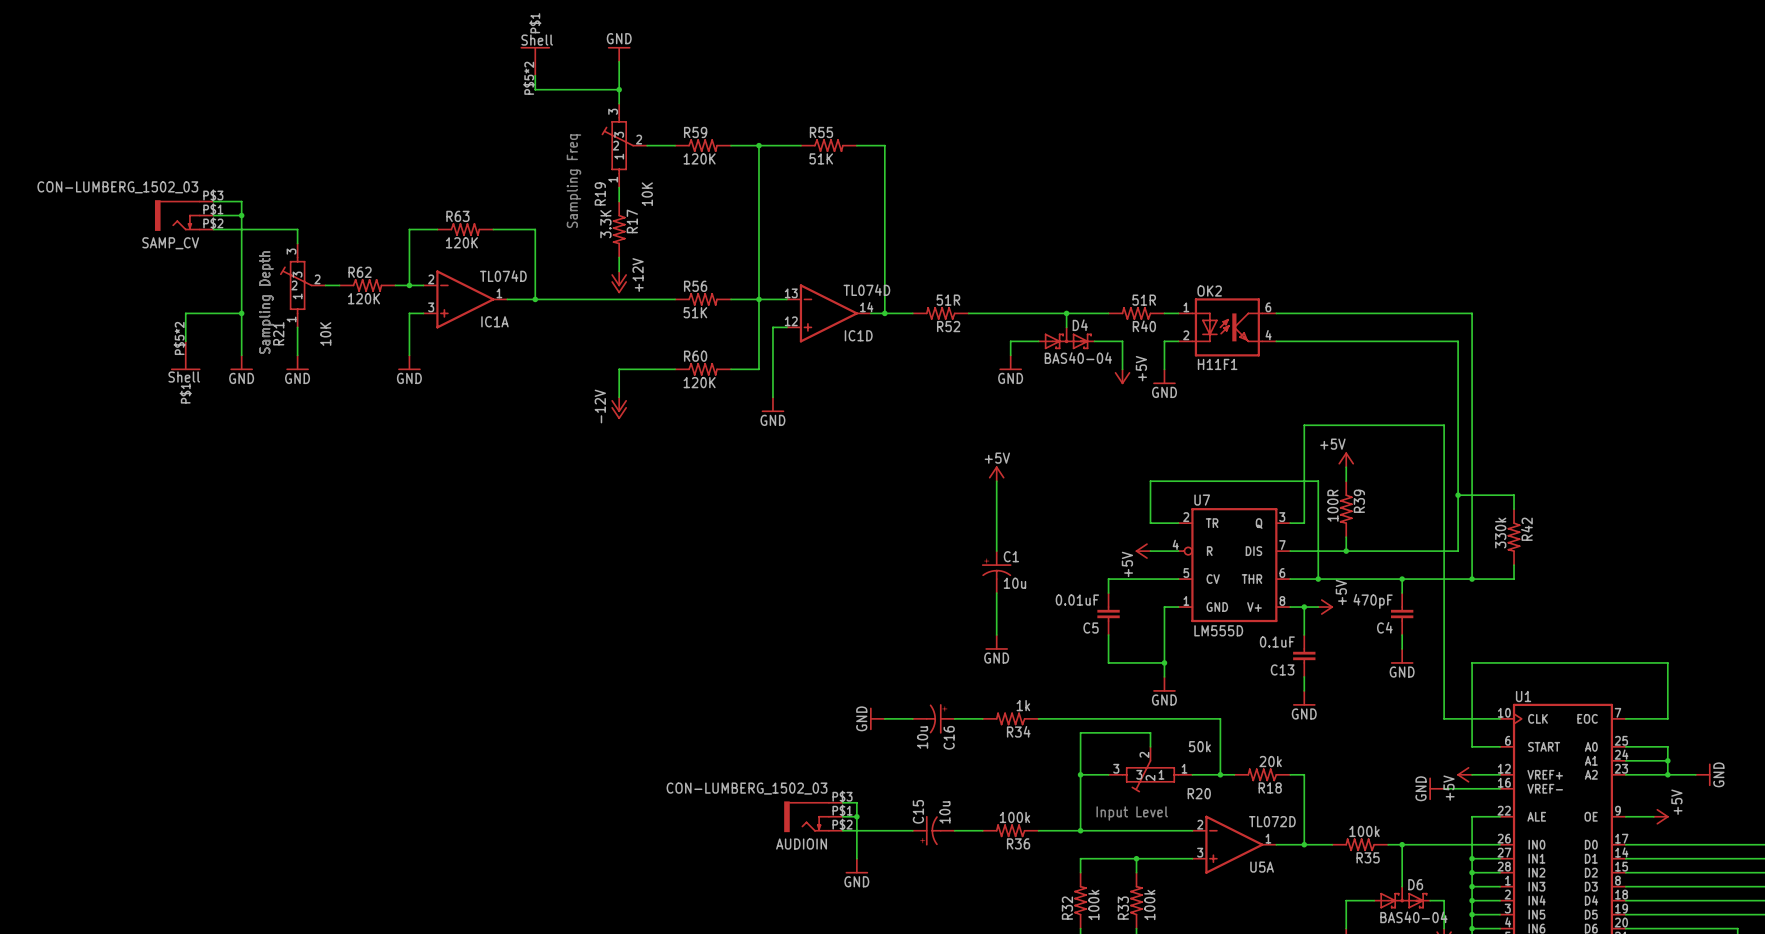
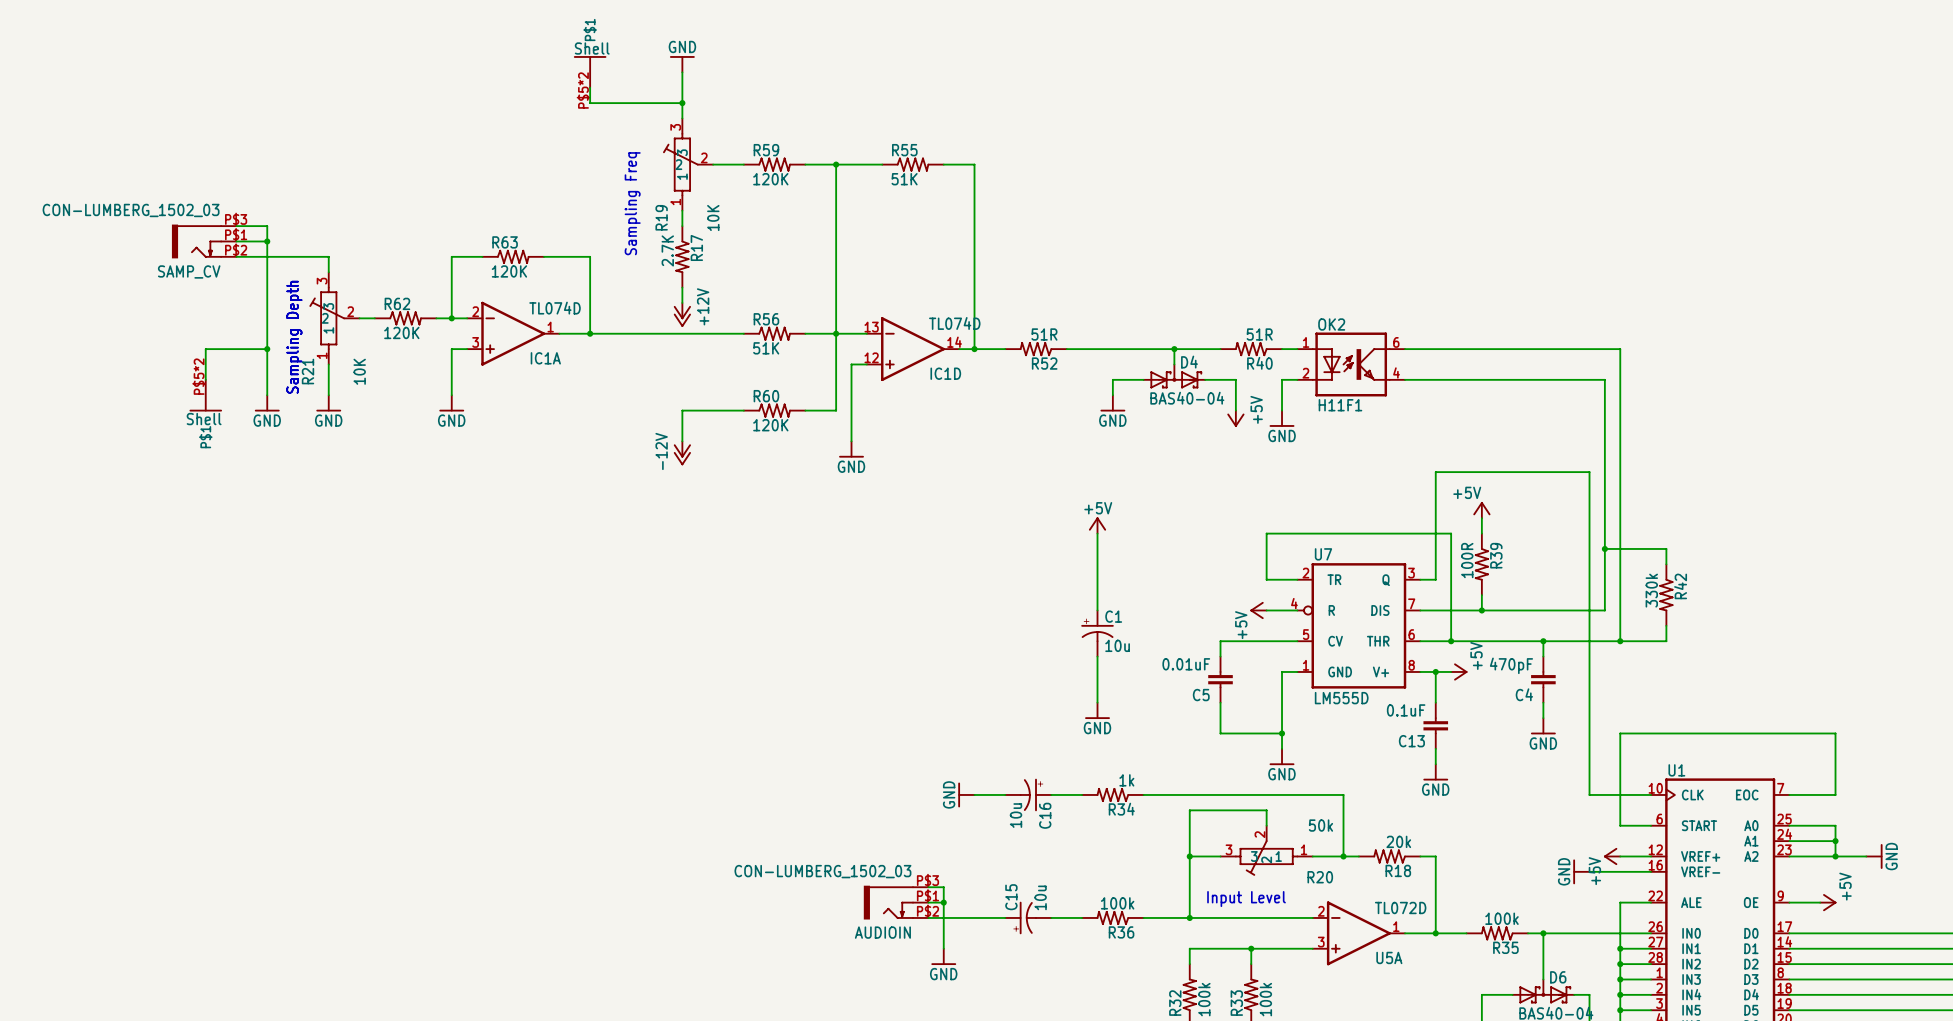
R17 value: 3.3K (605, 224) -> 2.7K (667, 250)

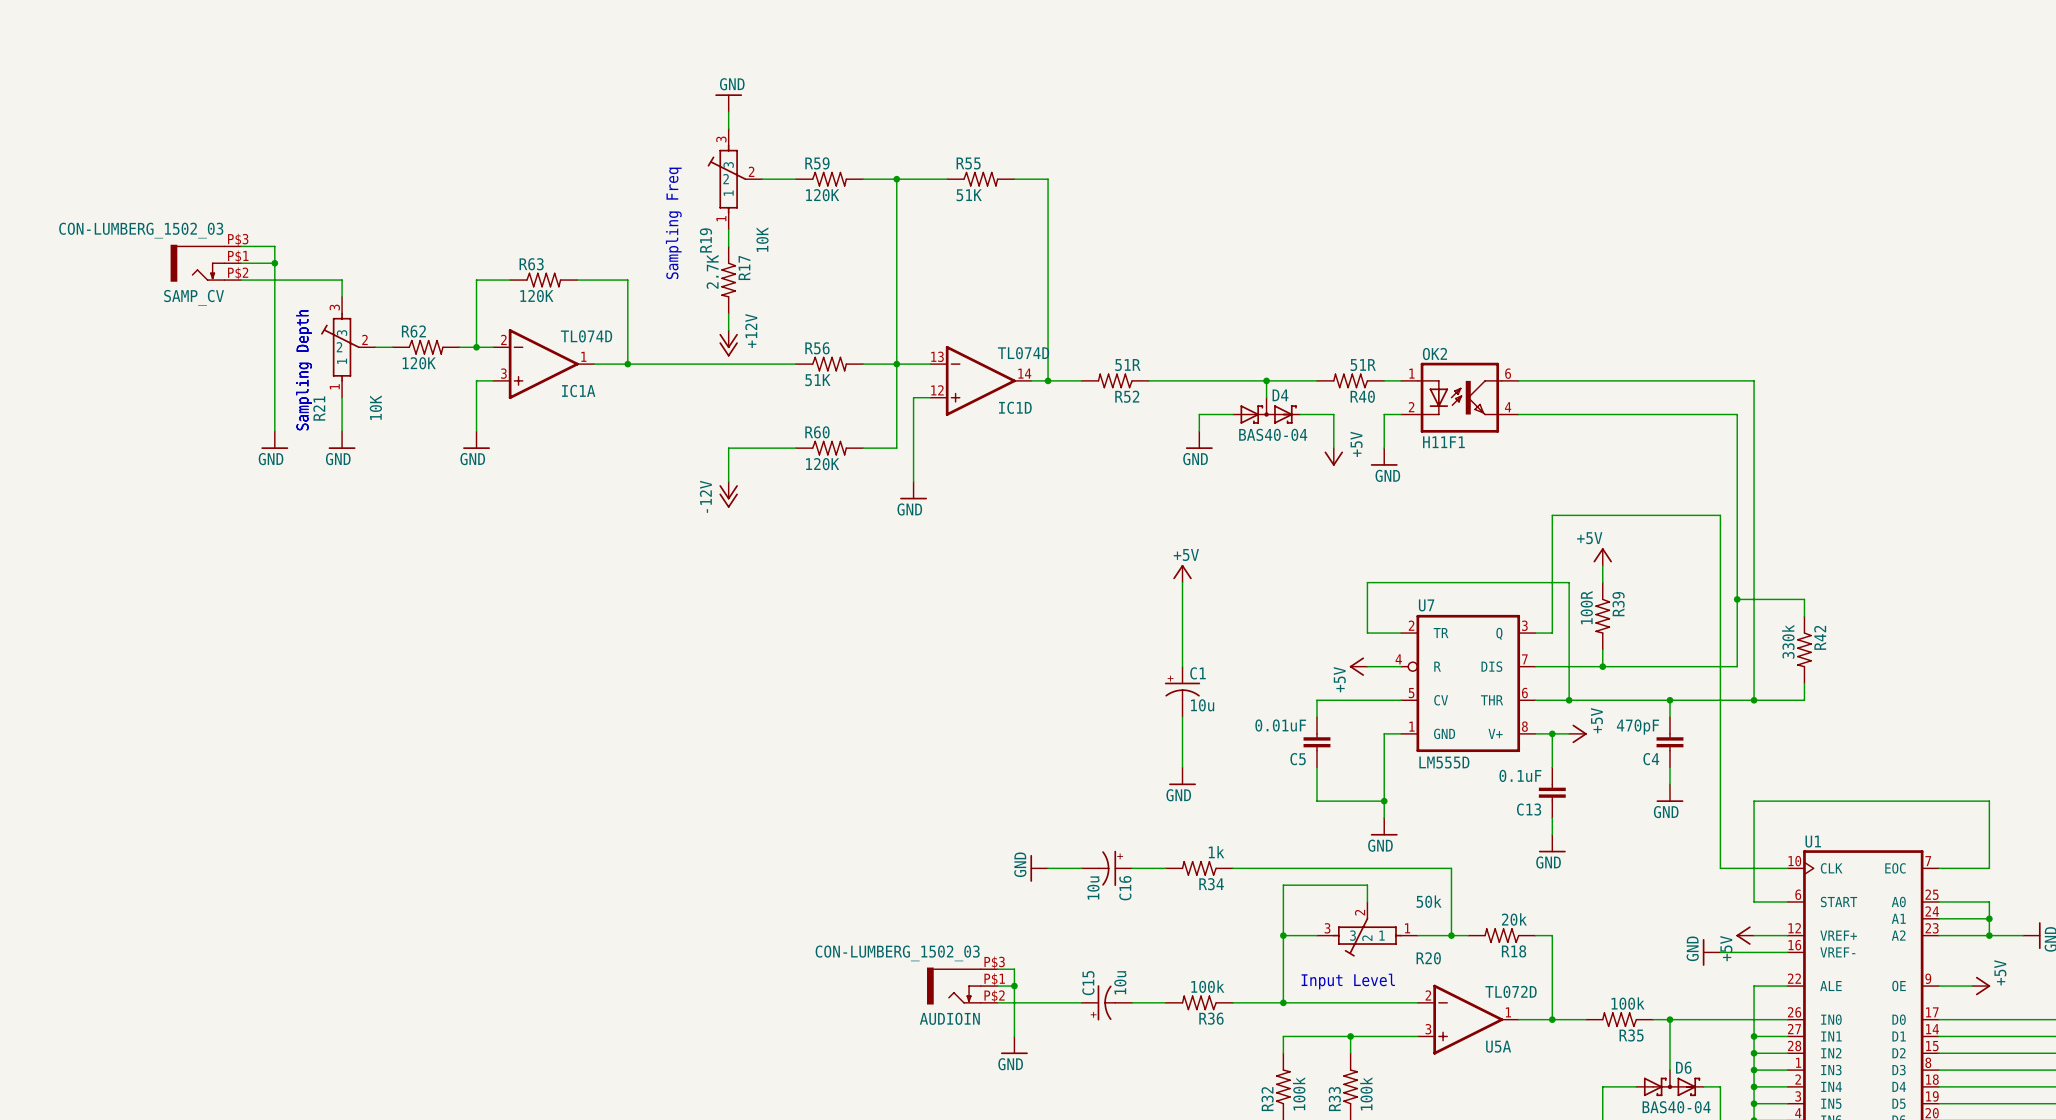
power symbol position: GND (682, 64) -> GND (728, 103)
part: (590, 71) -> none
wire: (682, 72) (682, 103) (590, 103) (590, 87) -> none
junction: (682, 103) -> none
wire: (267, 349) (205, 349) (205, 379) -> none
junction: (267, 349) -> none
part: (205, 395) -> none

